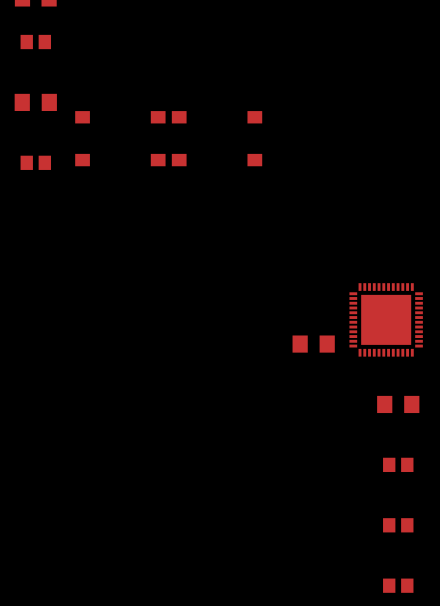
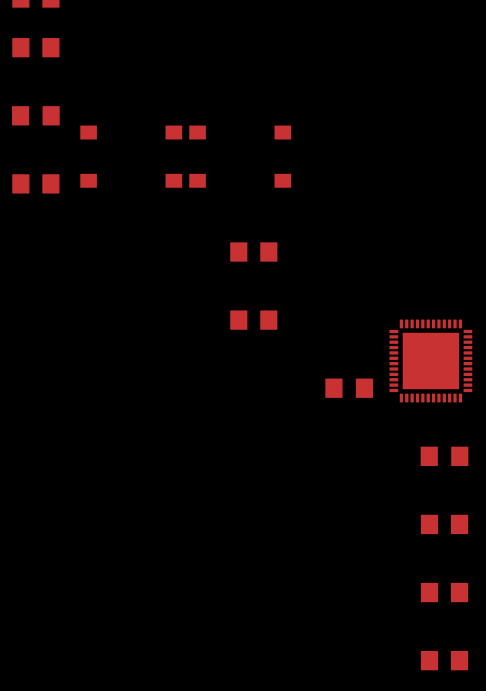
part footprint: [20, 34, 52, 50] -> [12, 38, 60, 58]
part footprint: [20, 155, 52, 170] -> [12, 174, 60, 194]
part: none -> (253, 252)
part: none -> (253, 320)
part footprint: [383, 457, 414, 473] -> [420, 514, 469, 535]
part footprint: [383, 518, 414, 533] -> [420, 582, 469, 603]
part footprint: [383, 578, 414, 593] -> [420, 650, 469, 671]

